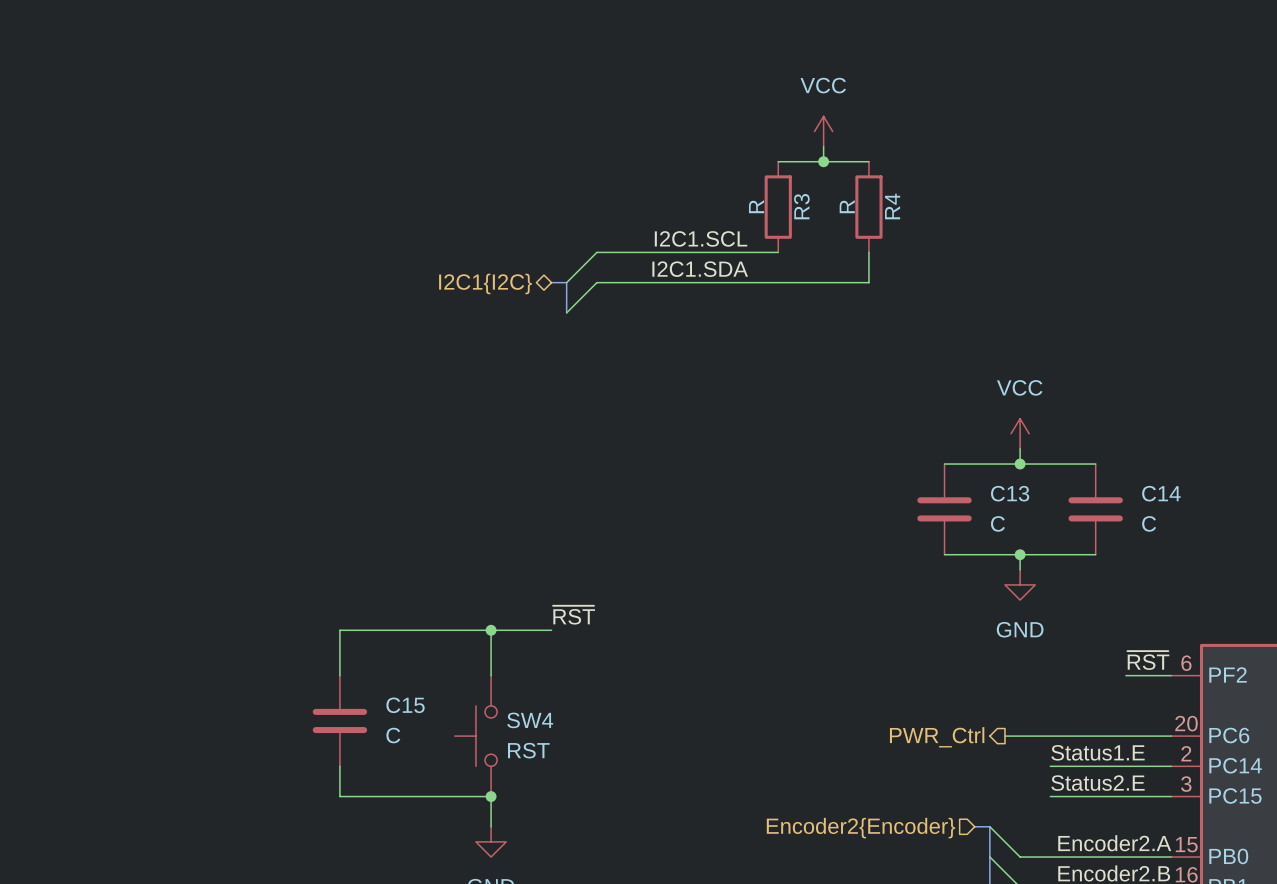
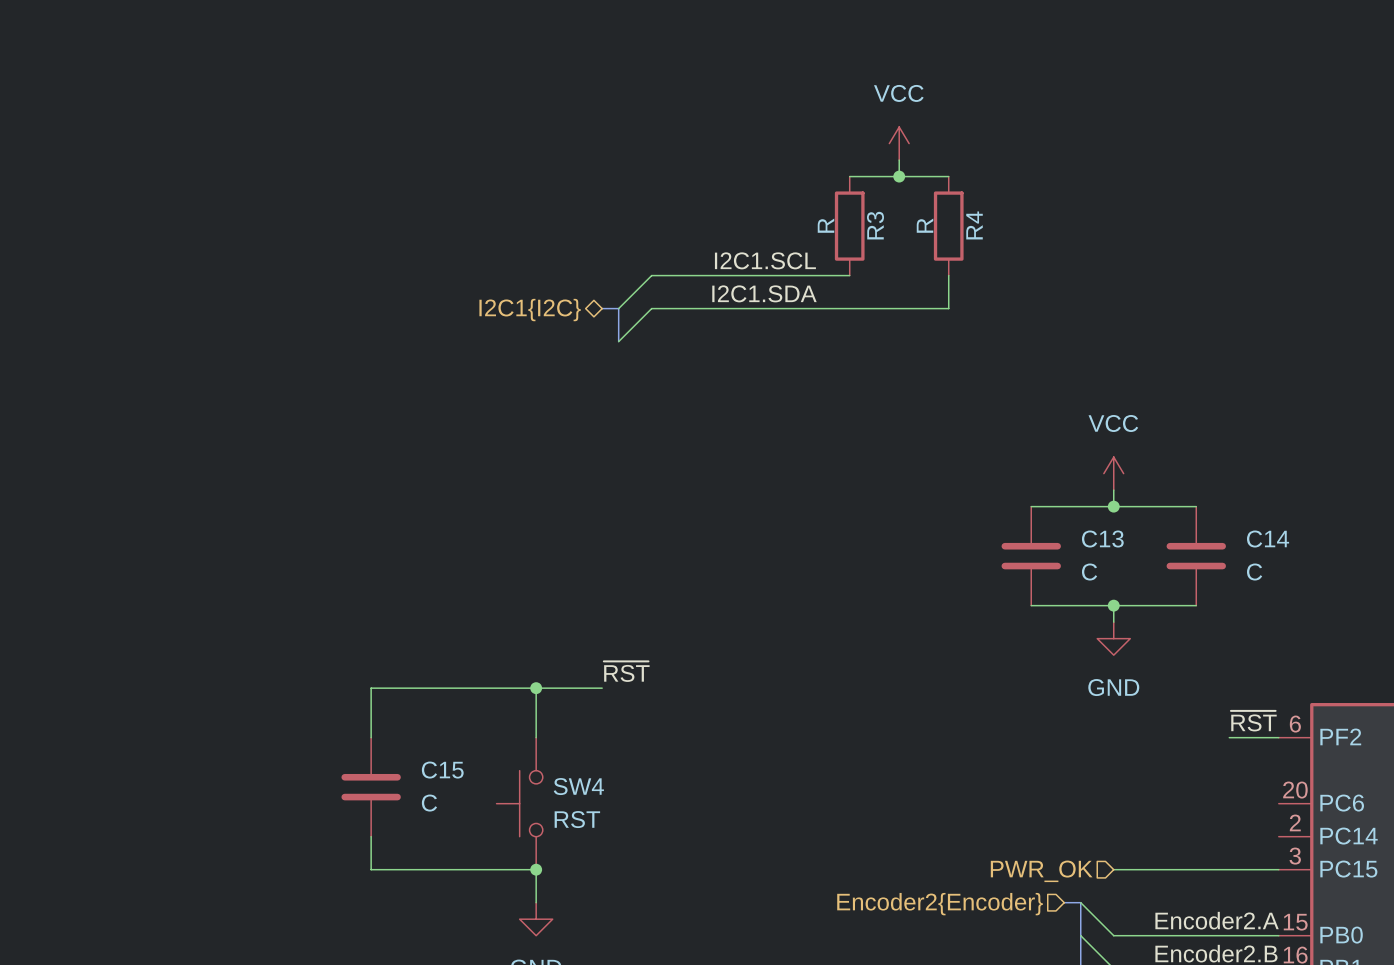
wire: (1004, 736) (1171, 736) -> none
hierarchical label: PWR_Ctrl (937, 737) -> none
label: Status1.E (1097, 752) -> none
wire: (1050, 766) (1171, 766) -> none
label: Status2.E (1097, 783) -> none
wire: none -> (1113, 869) (1146, 869)
hierarchical label: none -> PWR_OK (1041, 871)

